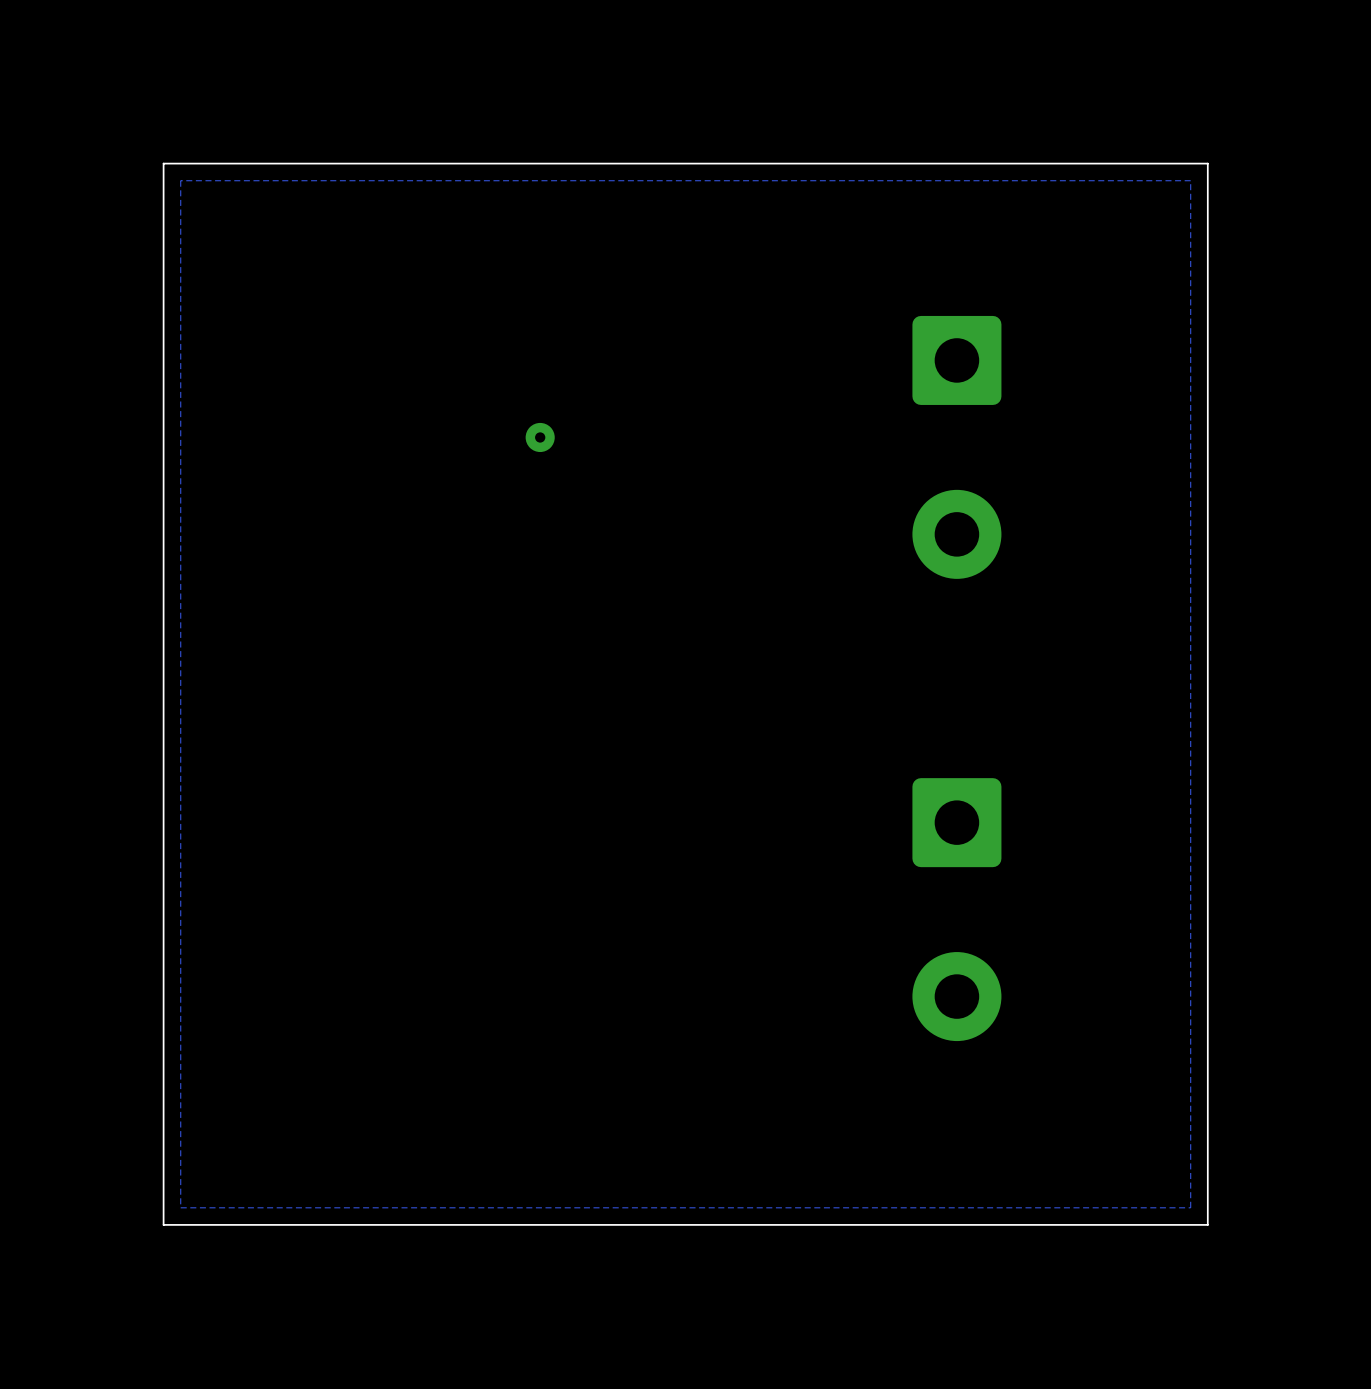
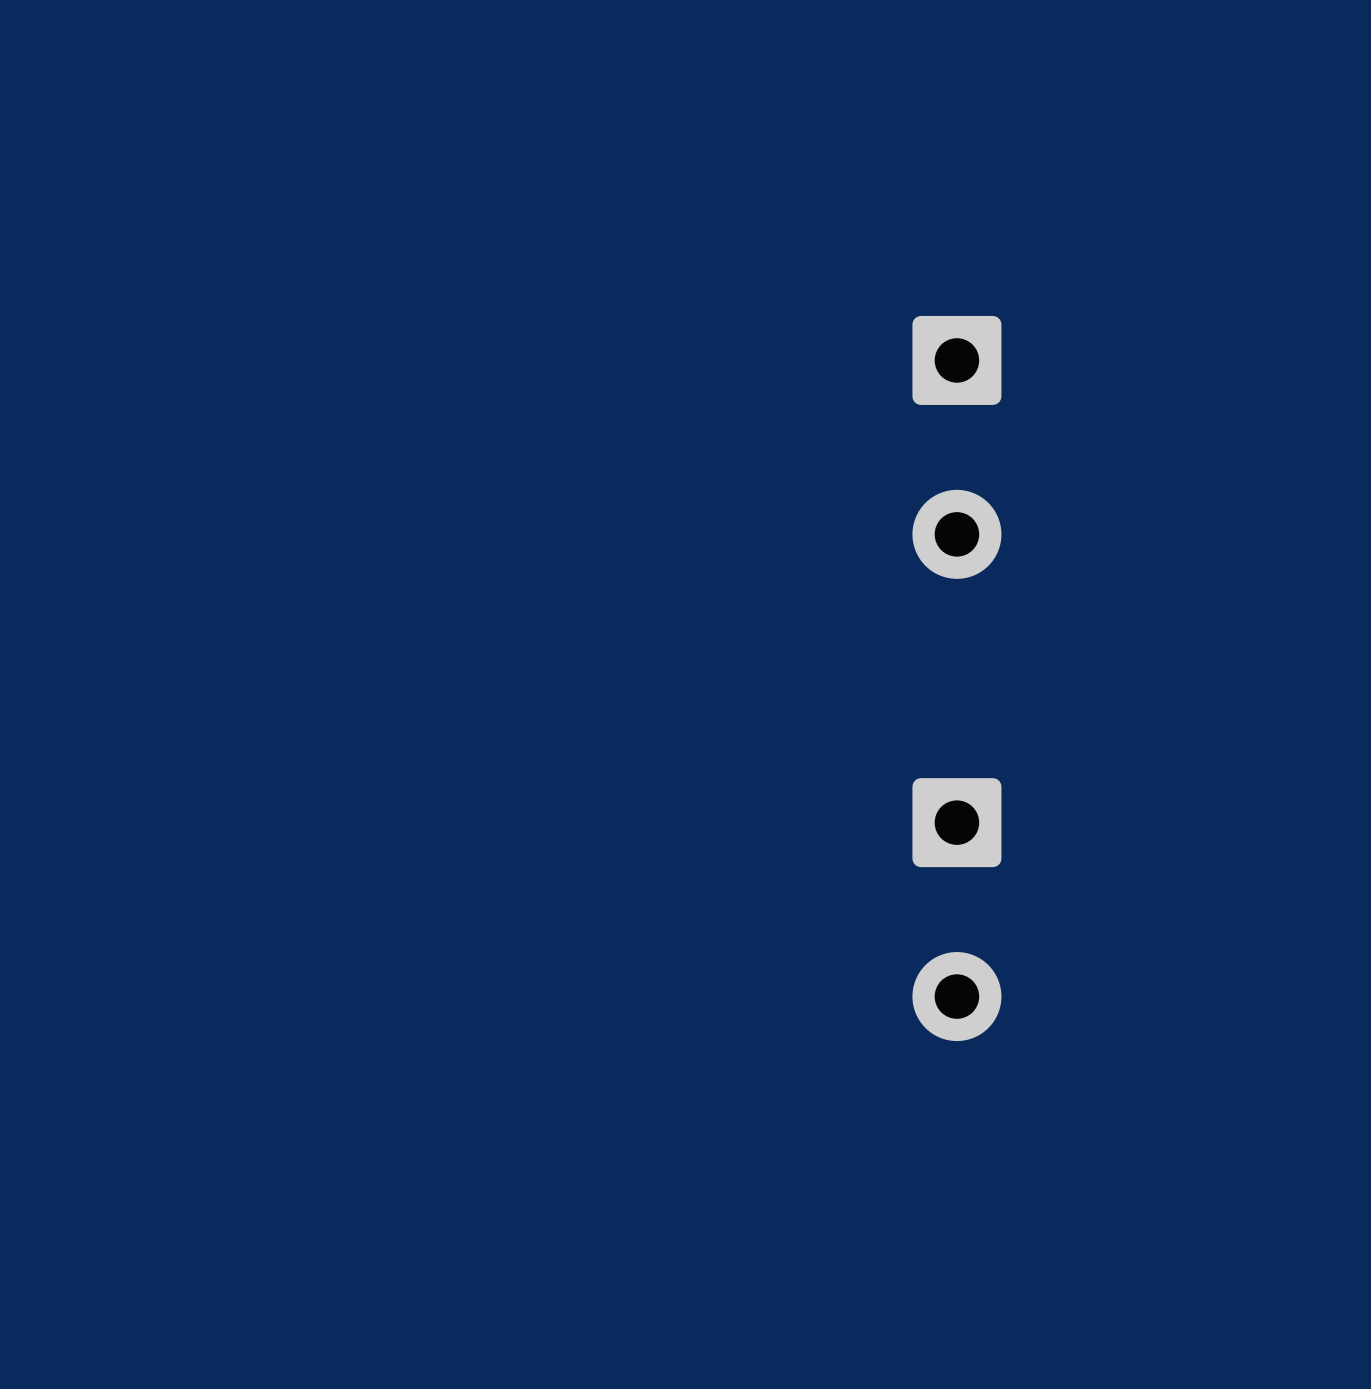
board edge: (1207, 163) (163, 163) (163, 1224) (1207, 1224) (1207, 163) -> none
zone outline: (1190, 180) (180, 180) (180, 1207) (1190, 1207) (1190, 180) -> none
via: (540, 437) -> none

